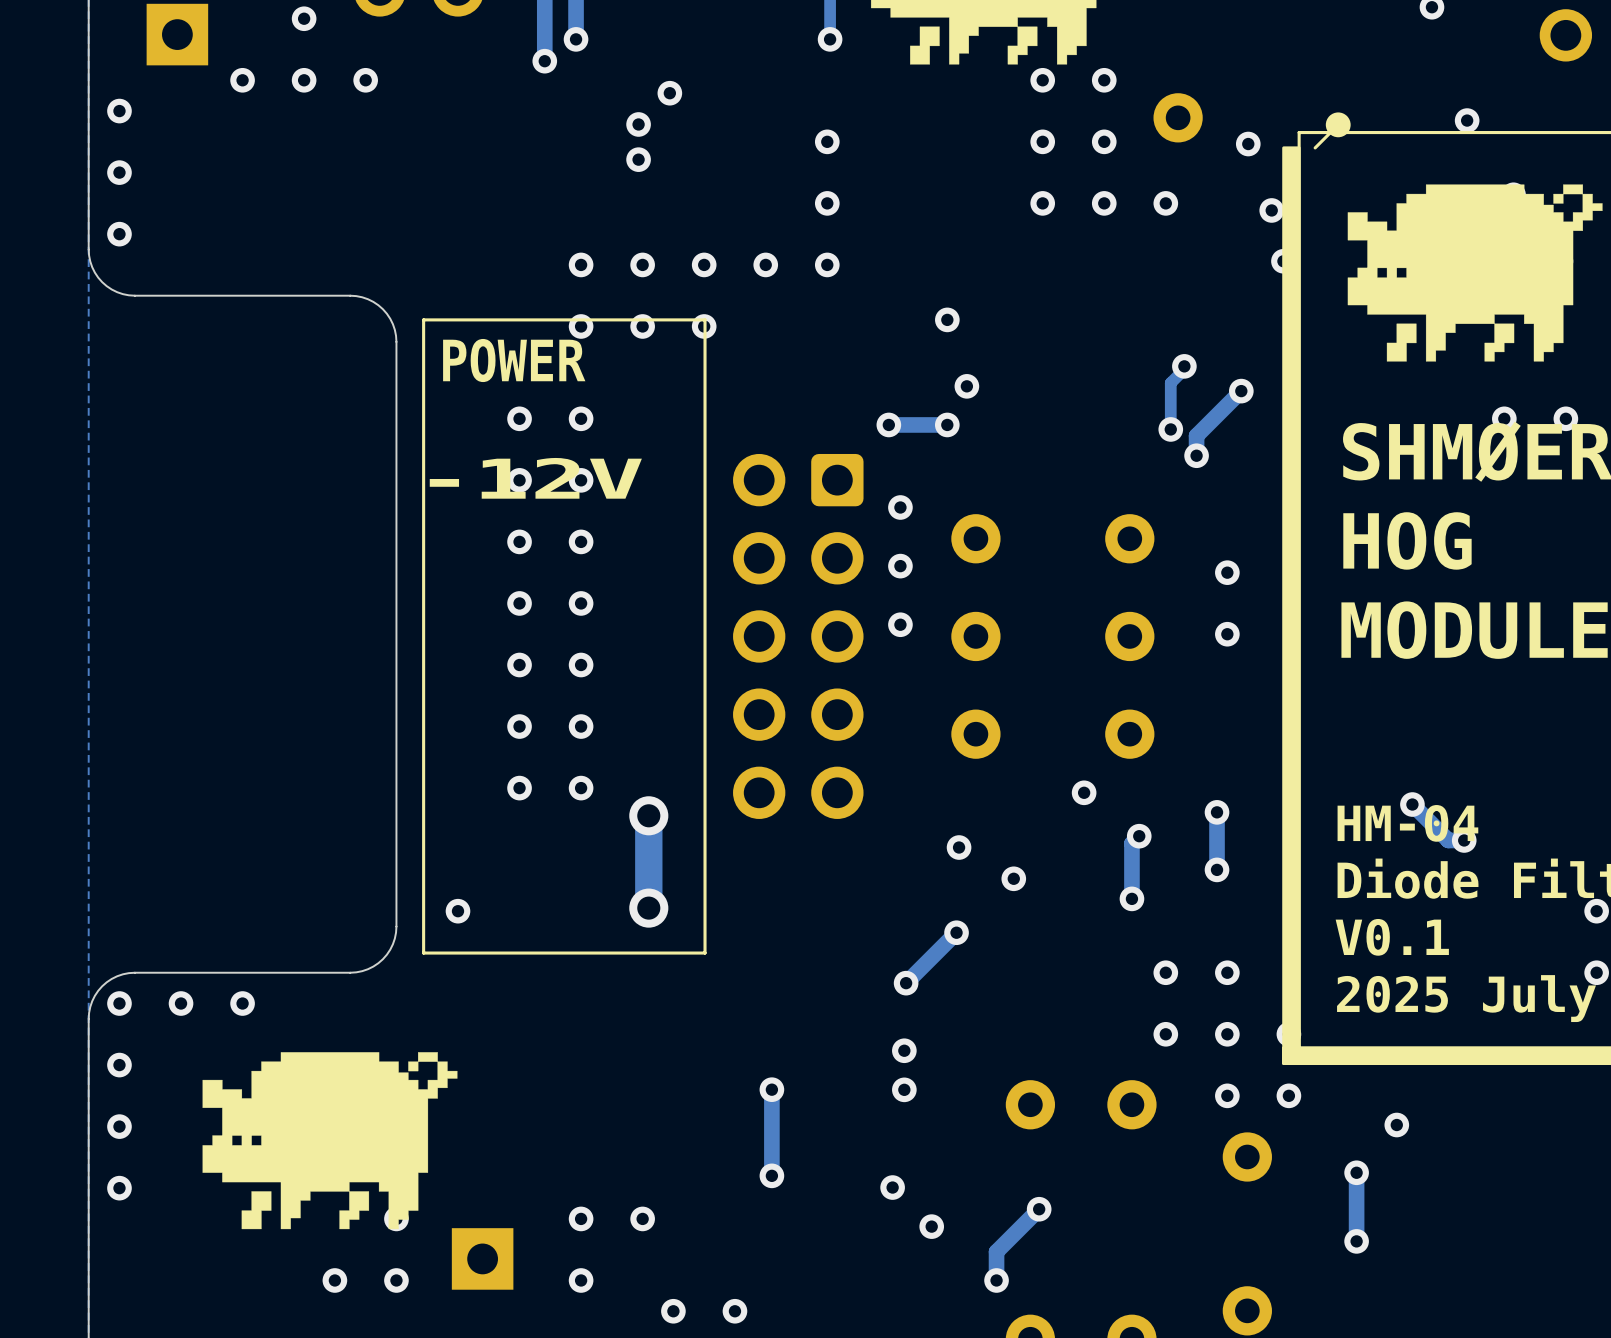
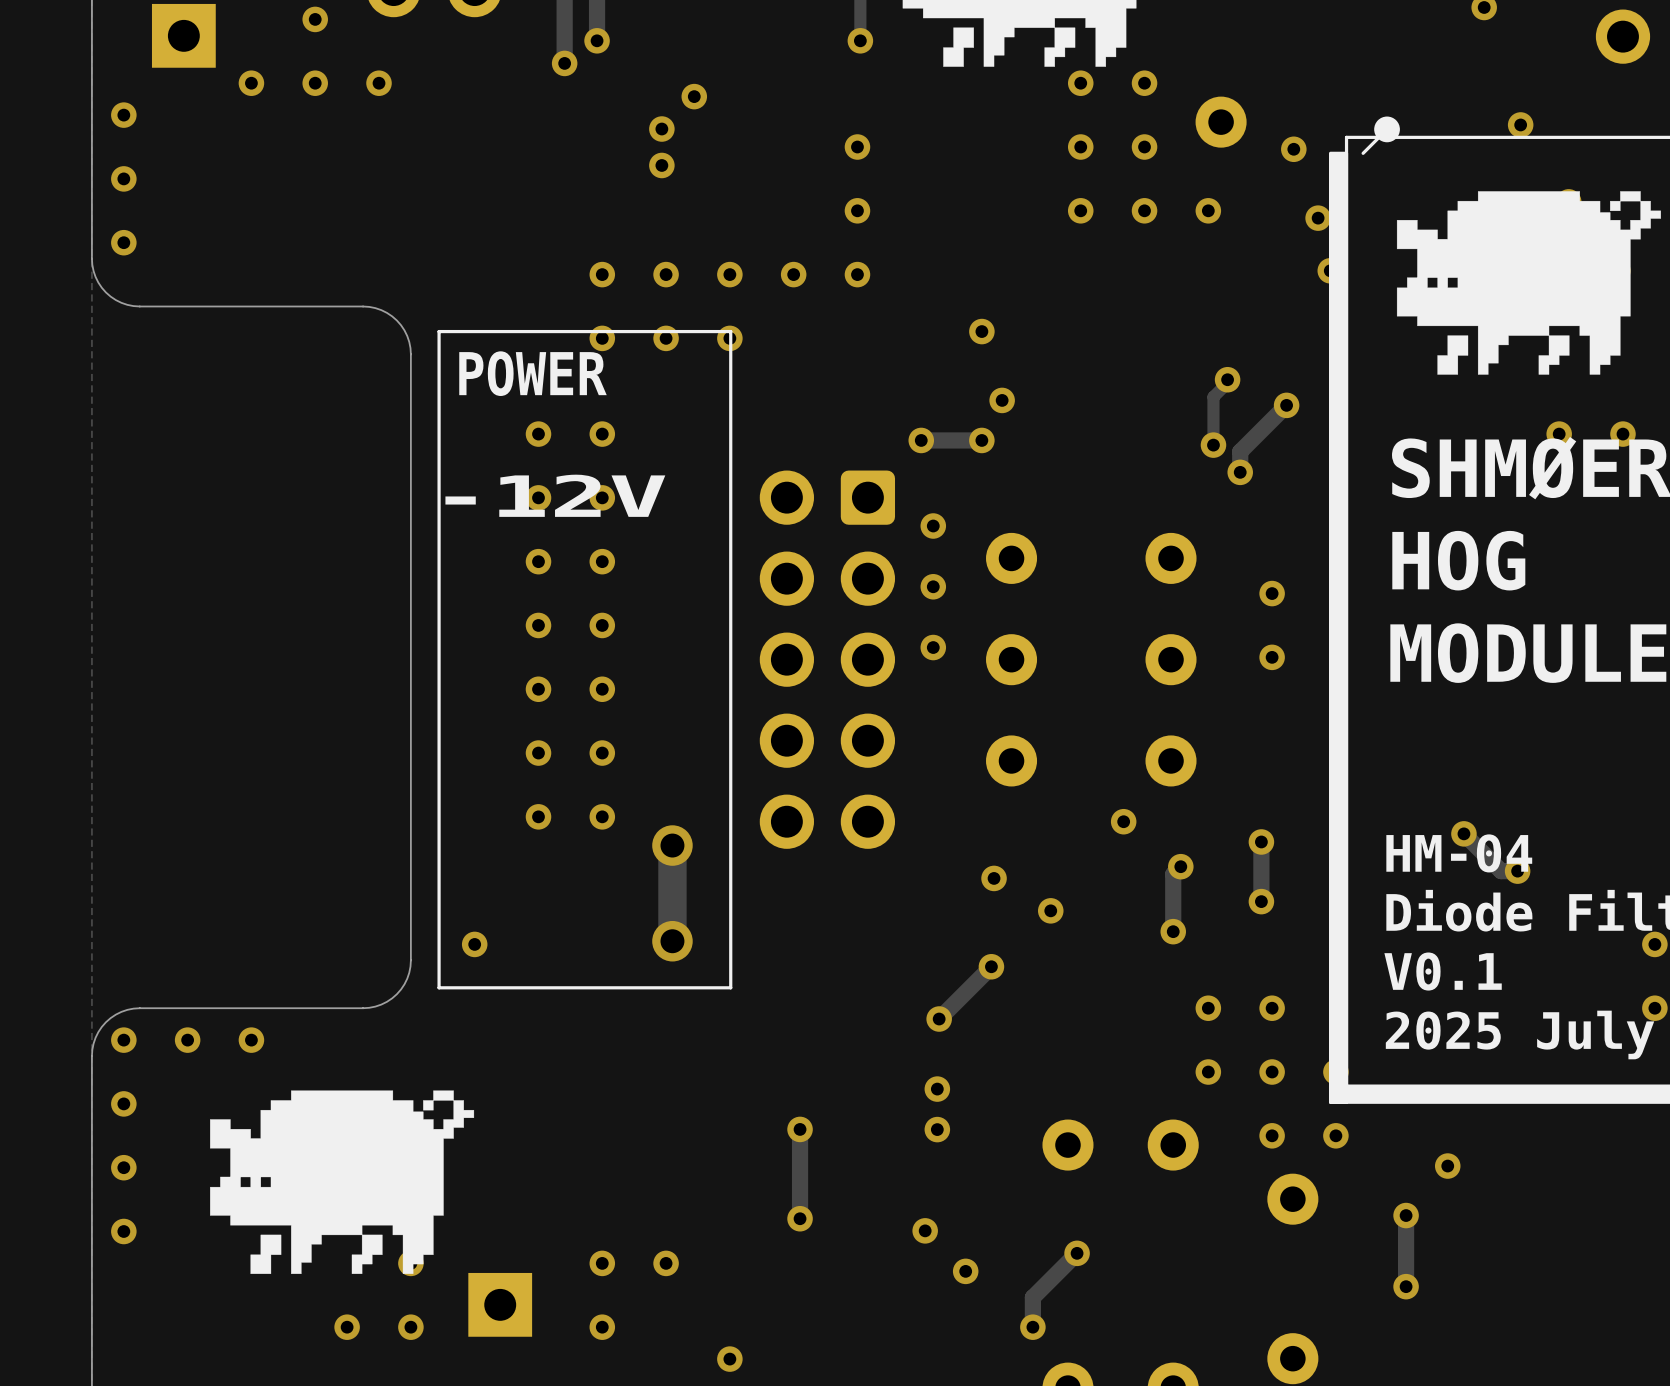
via: (673, 1311) -> none
via: none -> (729, 1359)
via: (734, 1311) -> none

